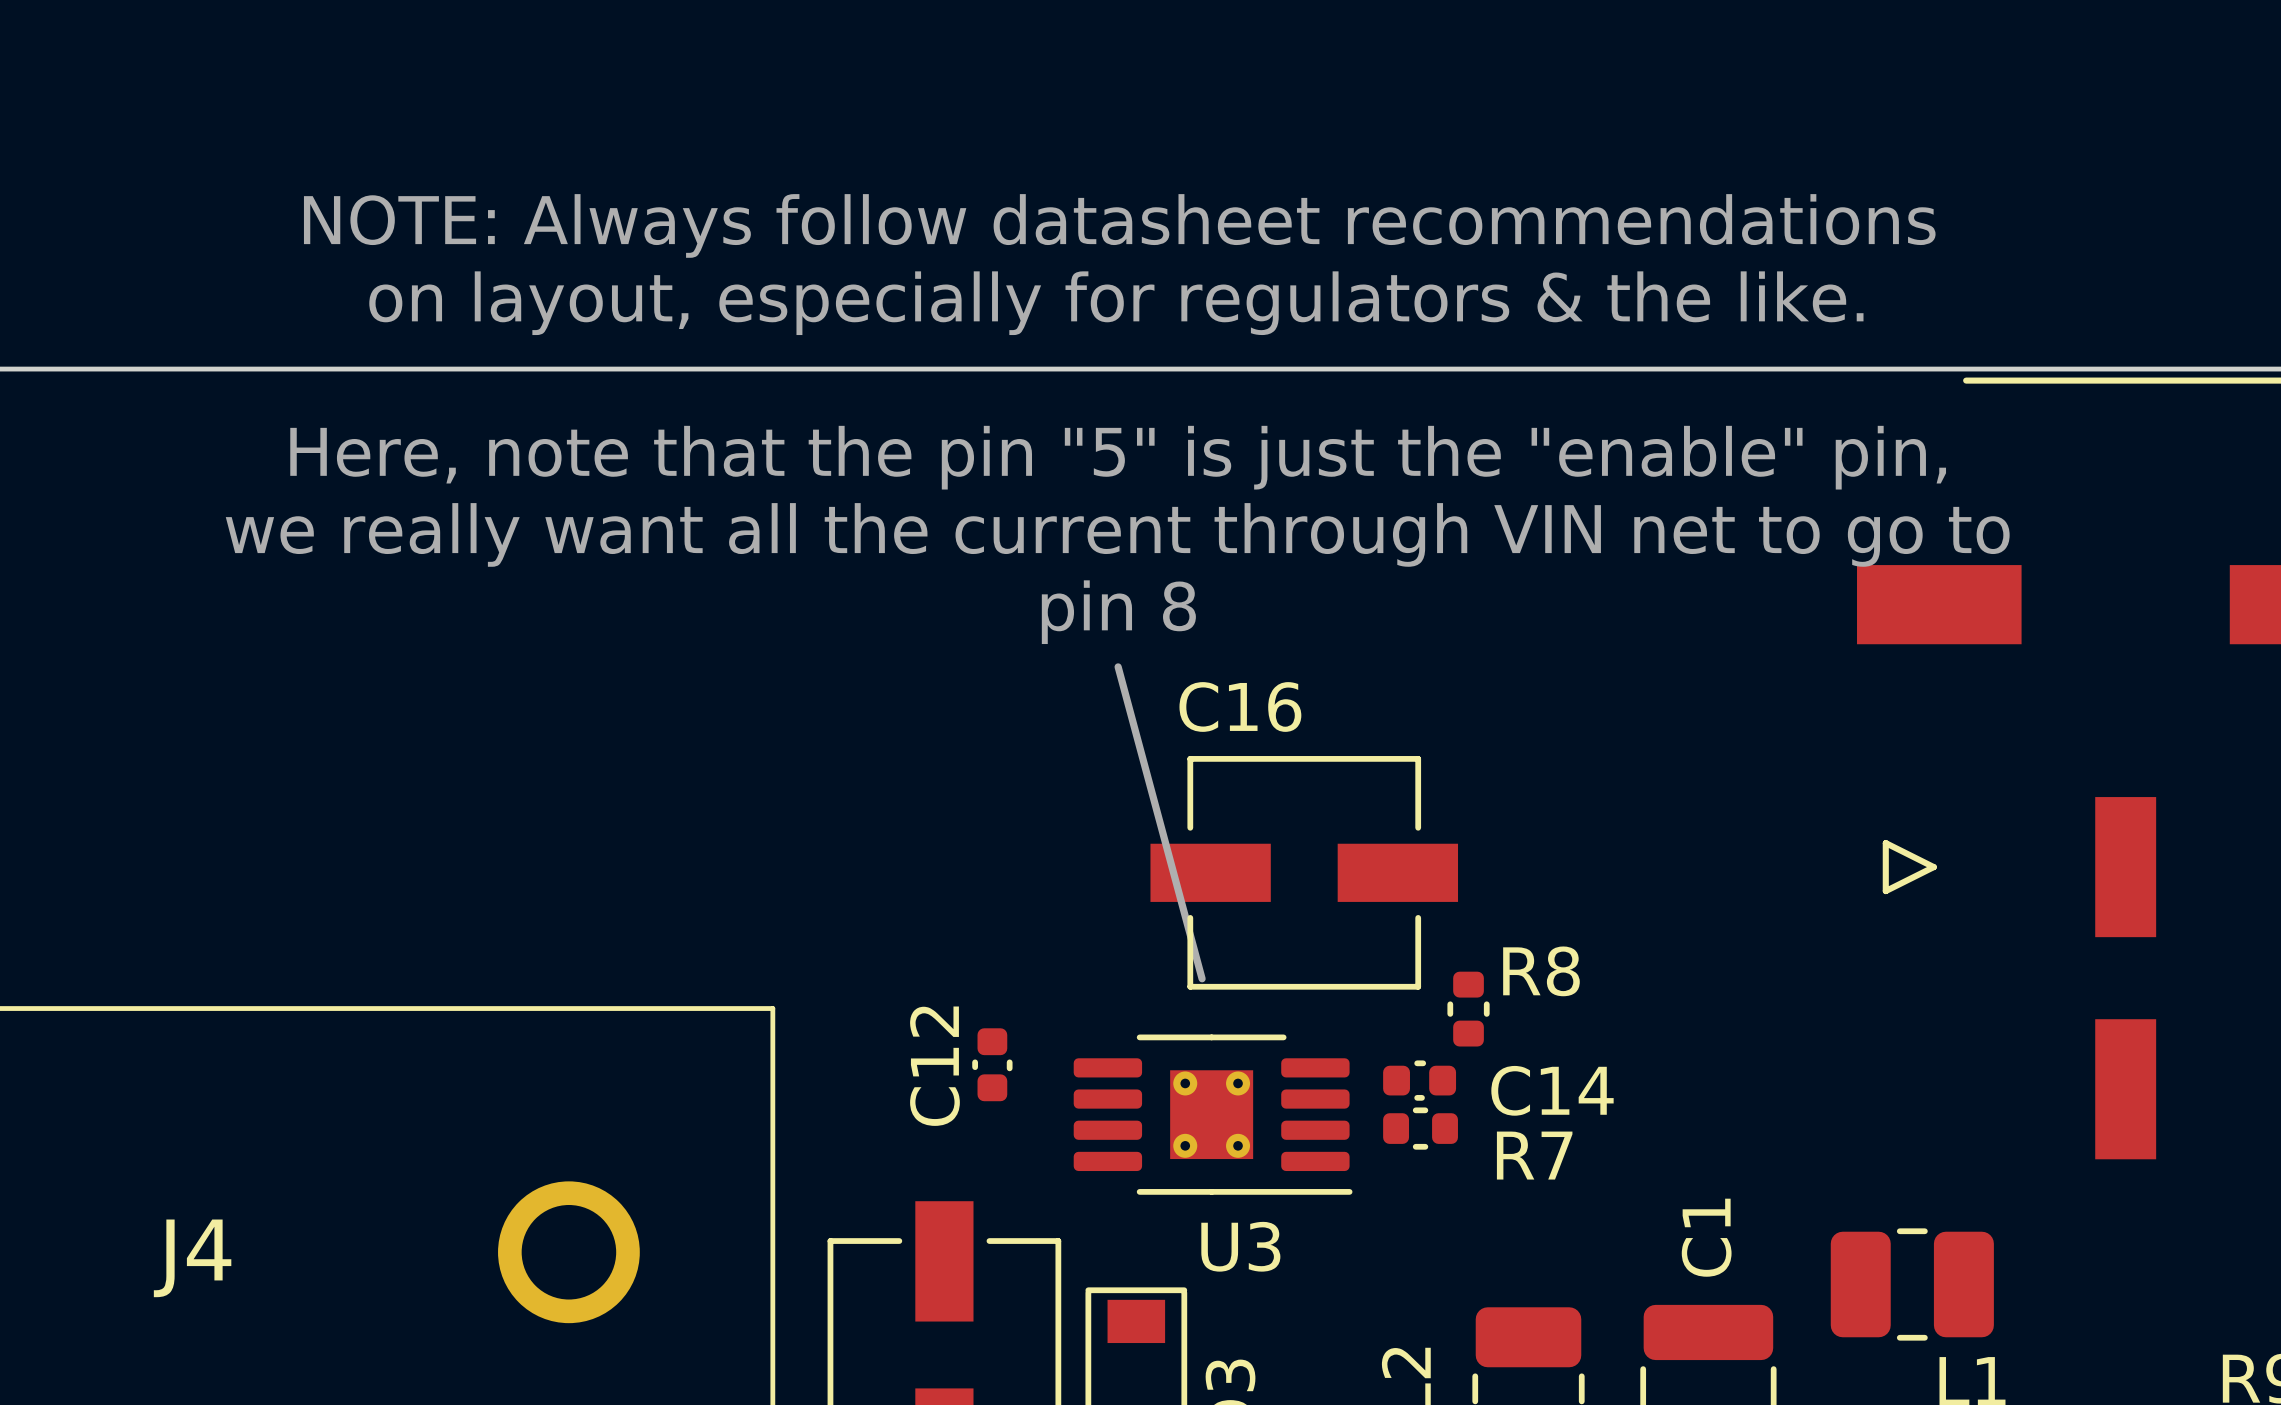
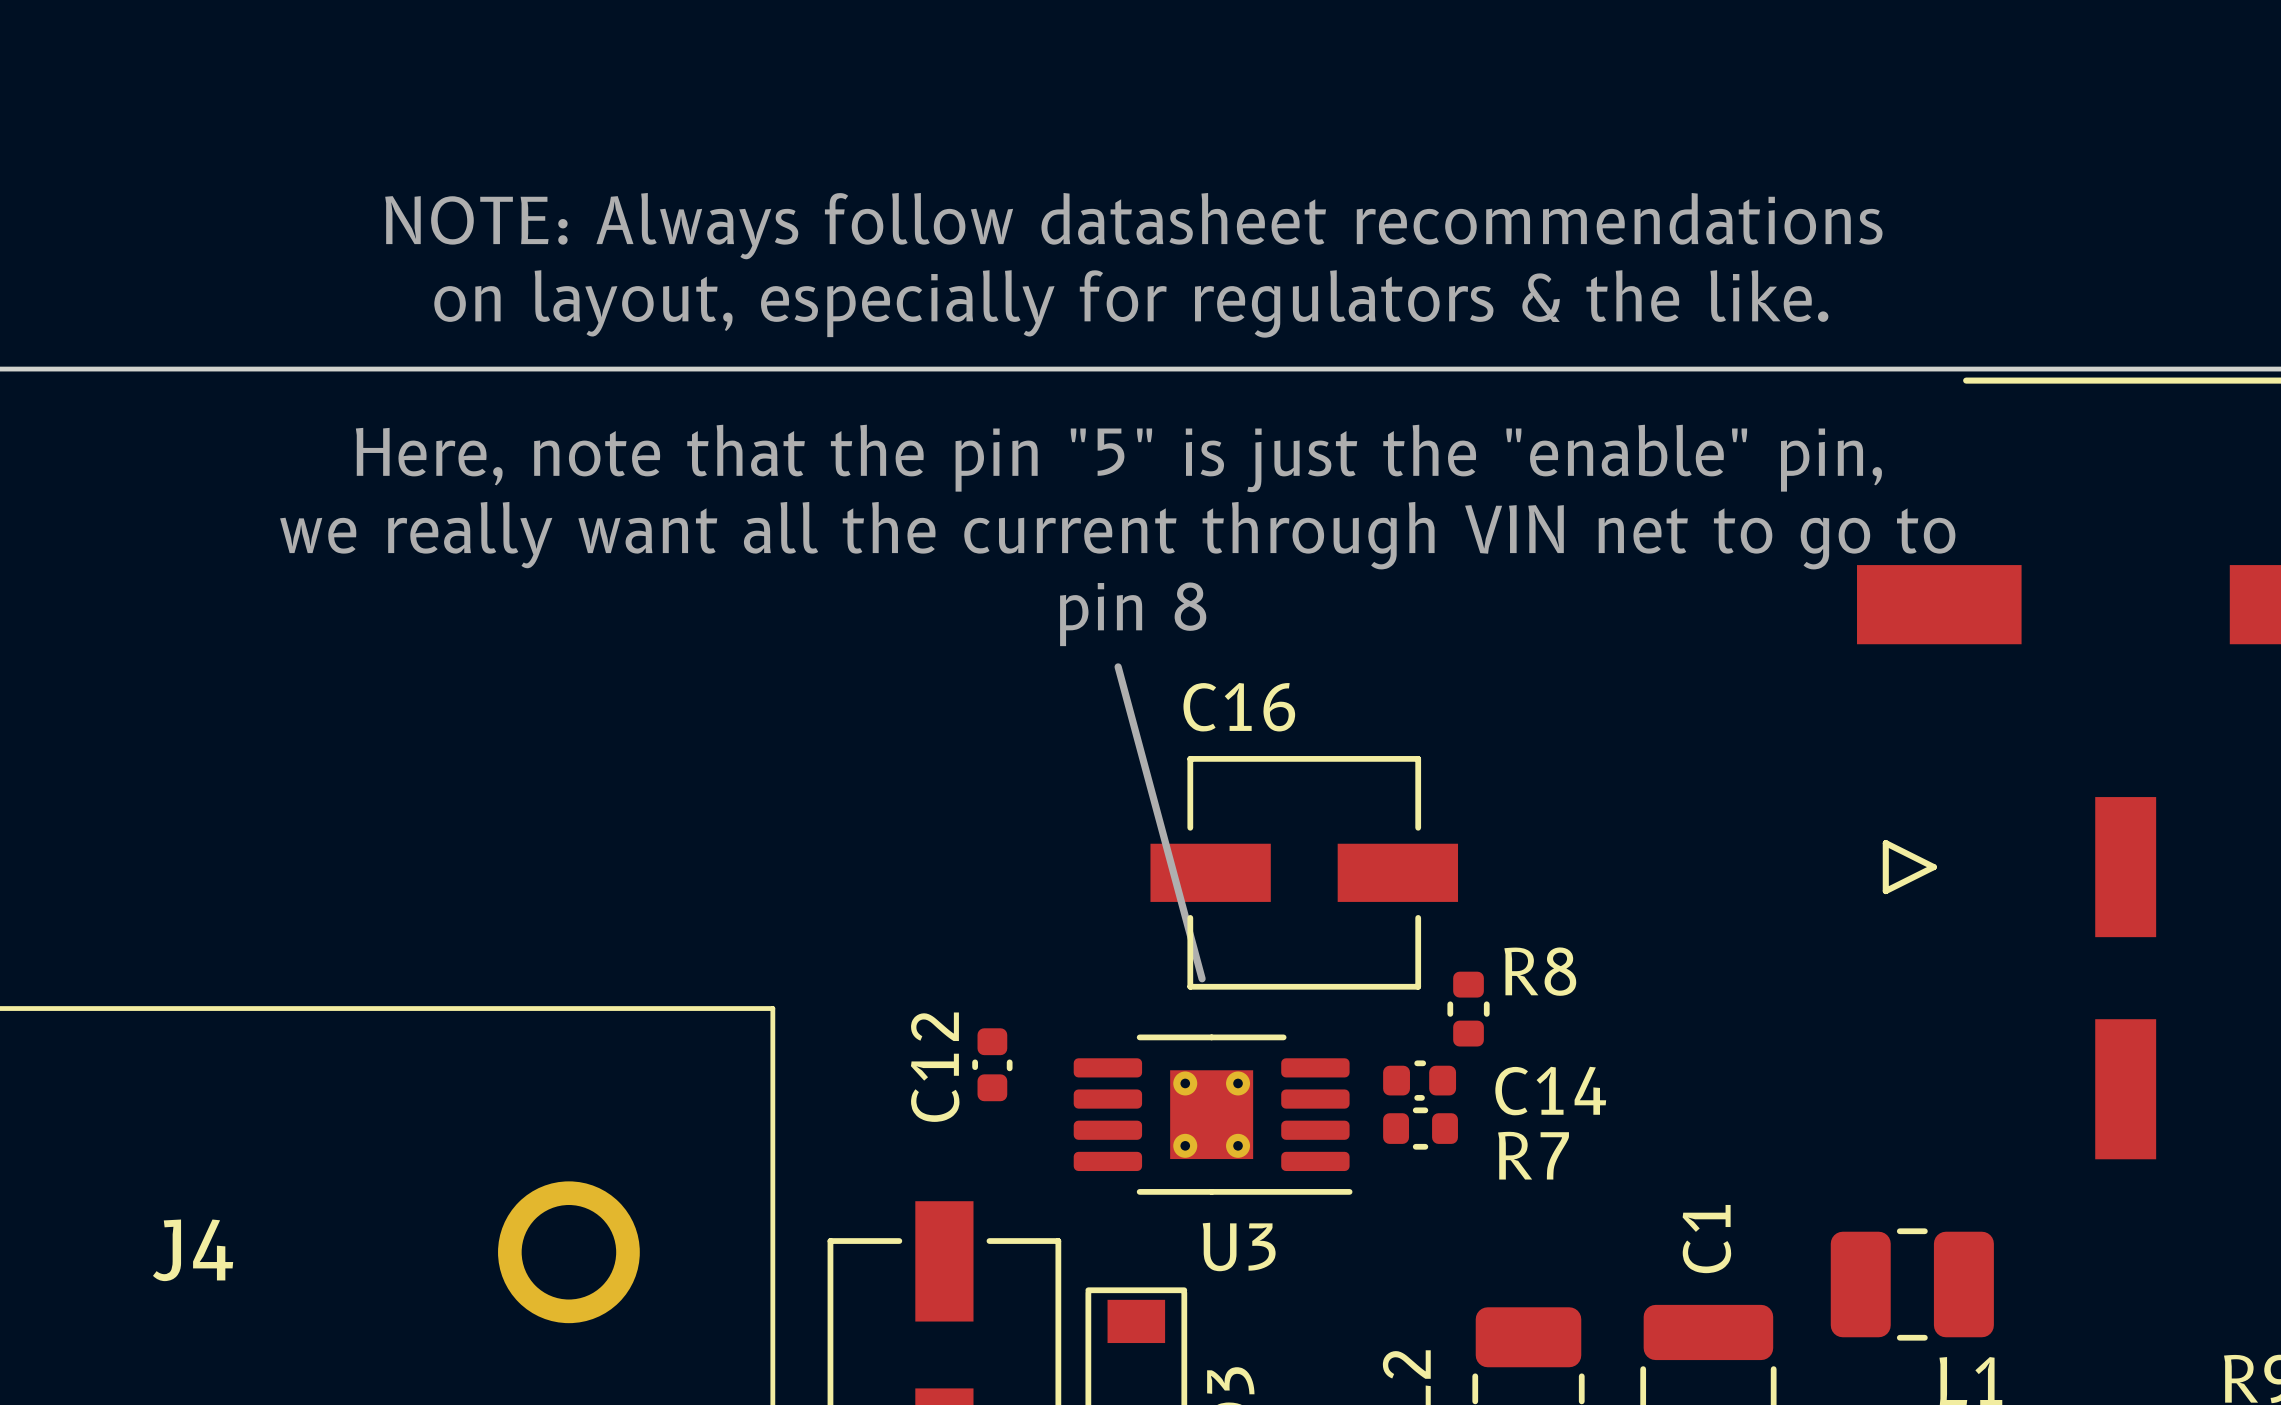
text position: NOTE: Always follow datasheet recommendations (1119, 225) -> NOTE: Always follow datasheet recommendations (1133, 226)
text position: on layout, especially for regulators & the like. (1116, 303) -> on layout, especially for regulators & the like. (1131, 303)
text position: pin 8 (1118, 612) -> pin 8 (1133, 614)

